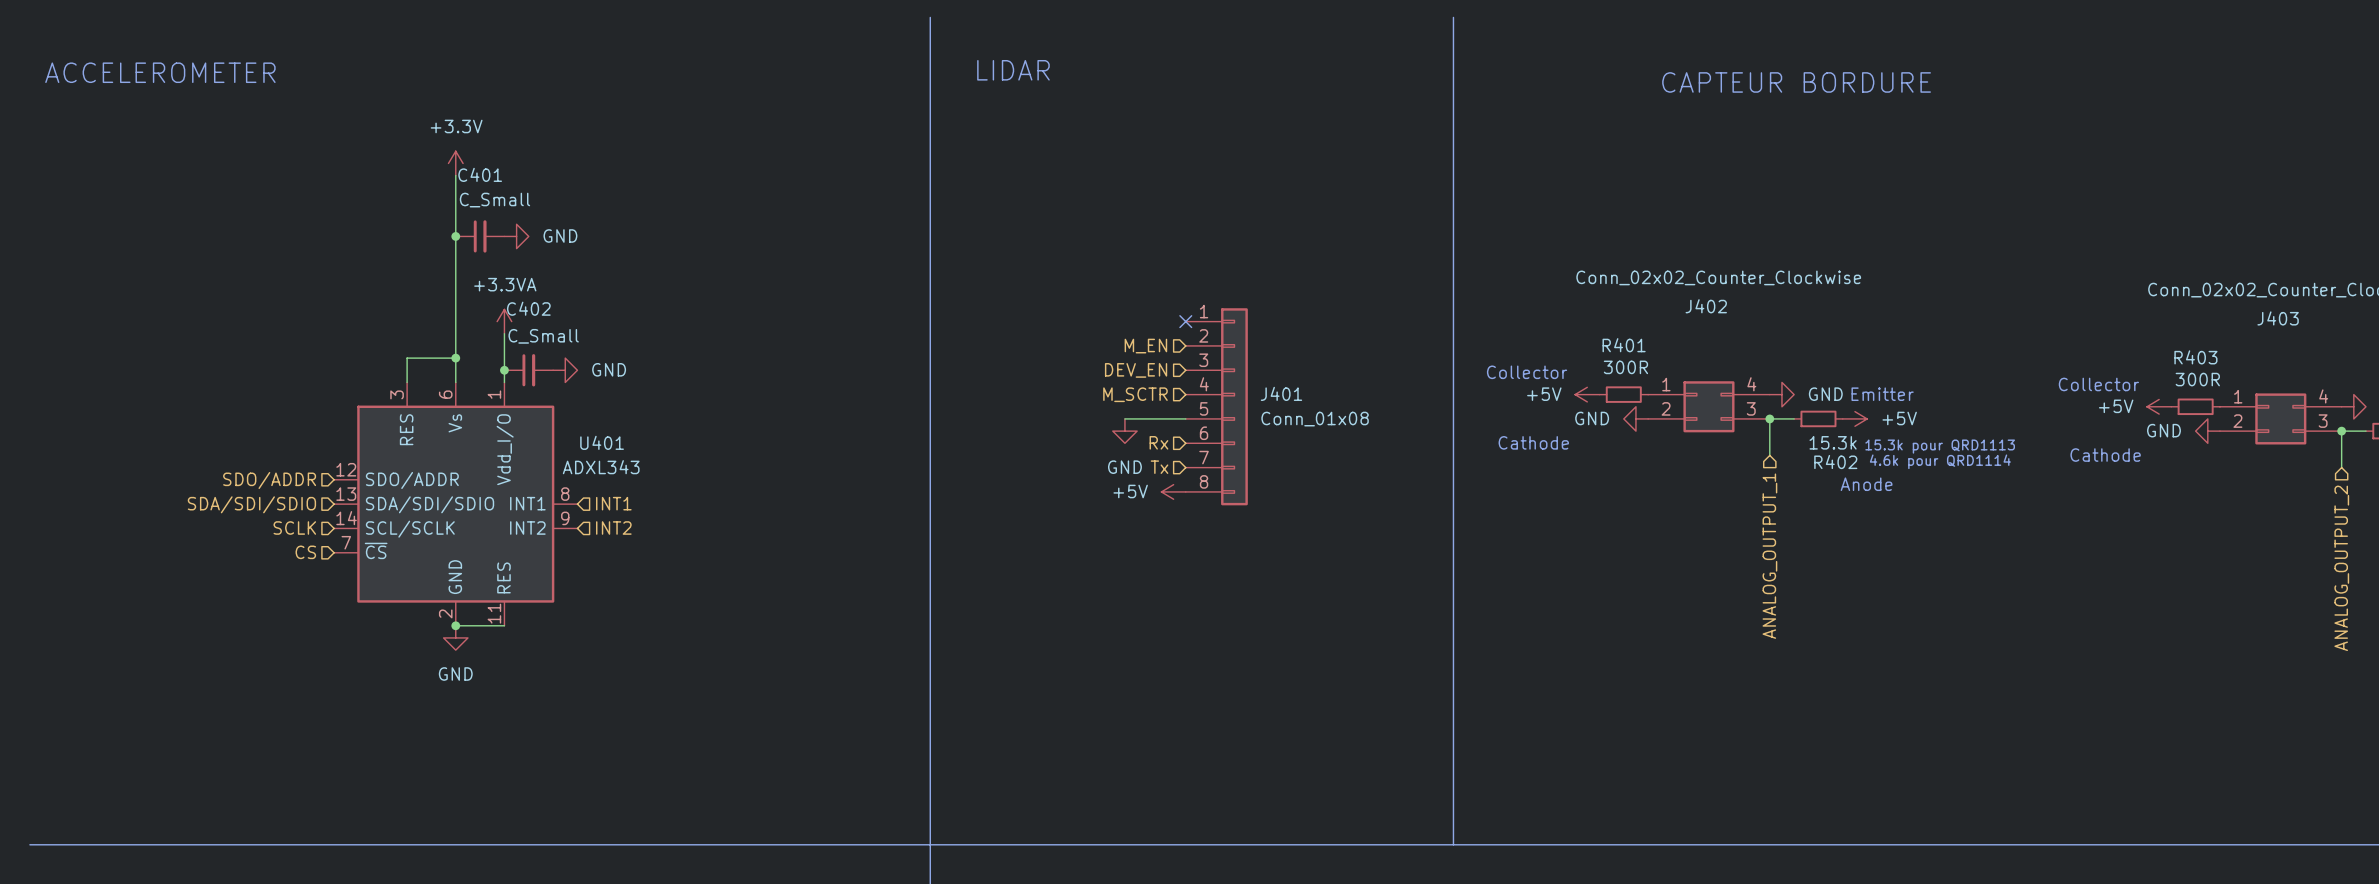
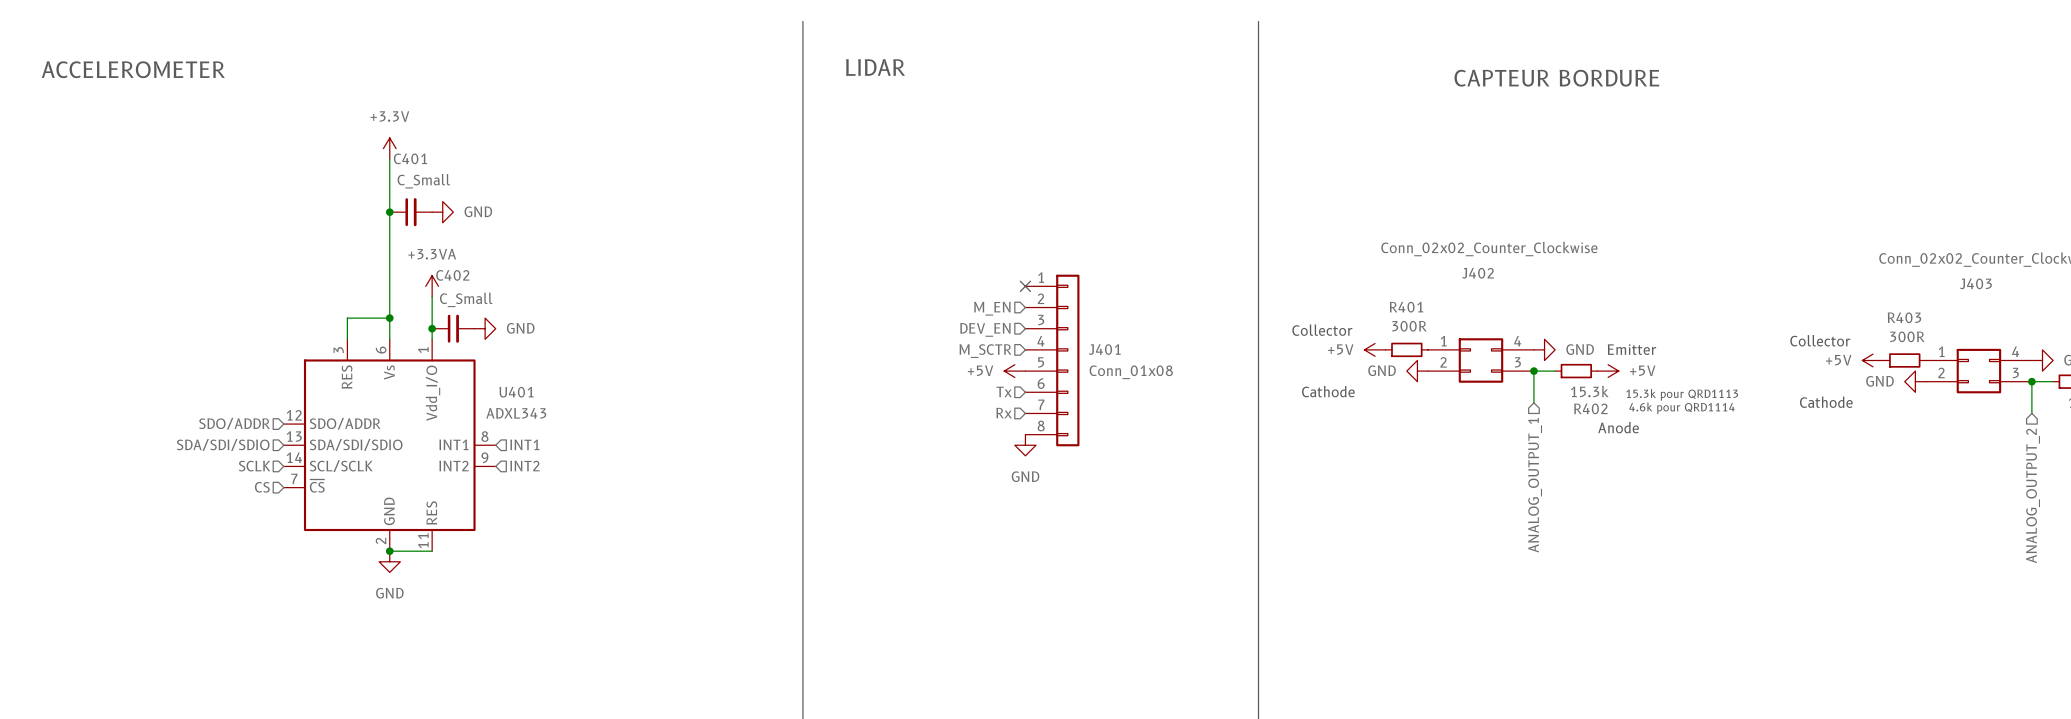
wire: (1124, 418) (1185, 418) -> none
power symbol position: GND (1124, 431) -> GND (1025, 445)
hierarchical label: Rx (1158, 442) -> Tx (1004, 391)
hierarchical label: Tx (1159, 467) -> Rx (1004, 413)
power symbol position: +5V (1173, 491) -> +5V (1014, 371)

